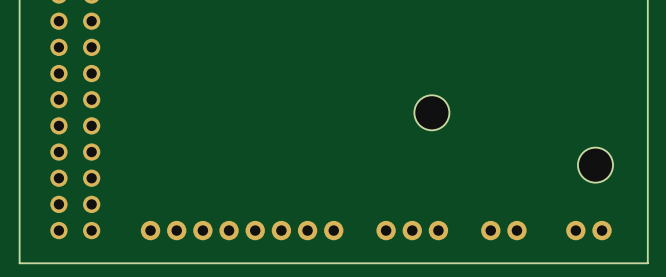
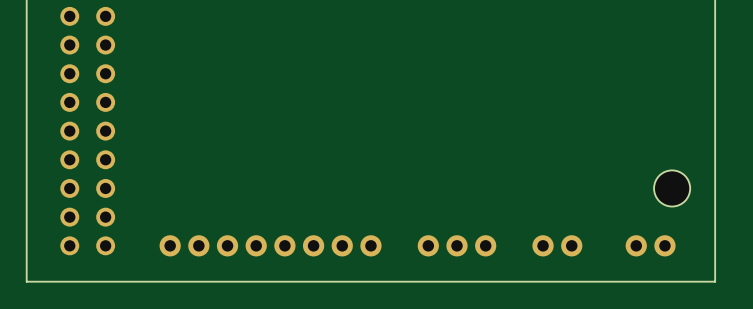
hole: (431, 112) -> none
hole: (595, 165) -> none
hole: none -> (672, 188)

